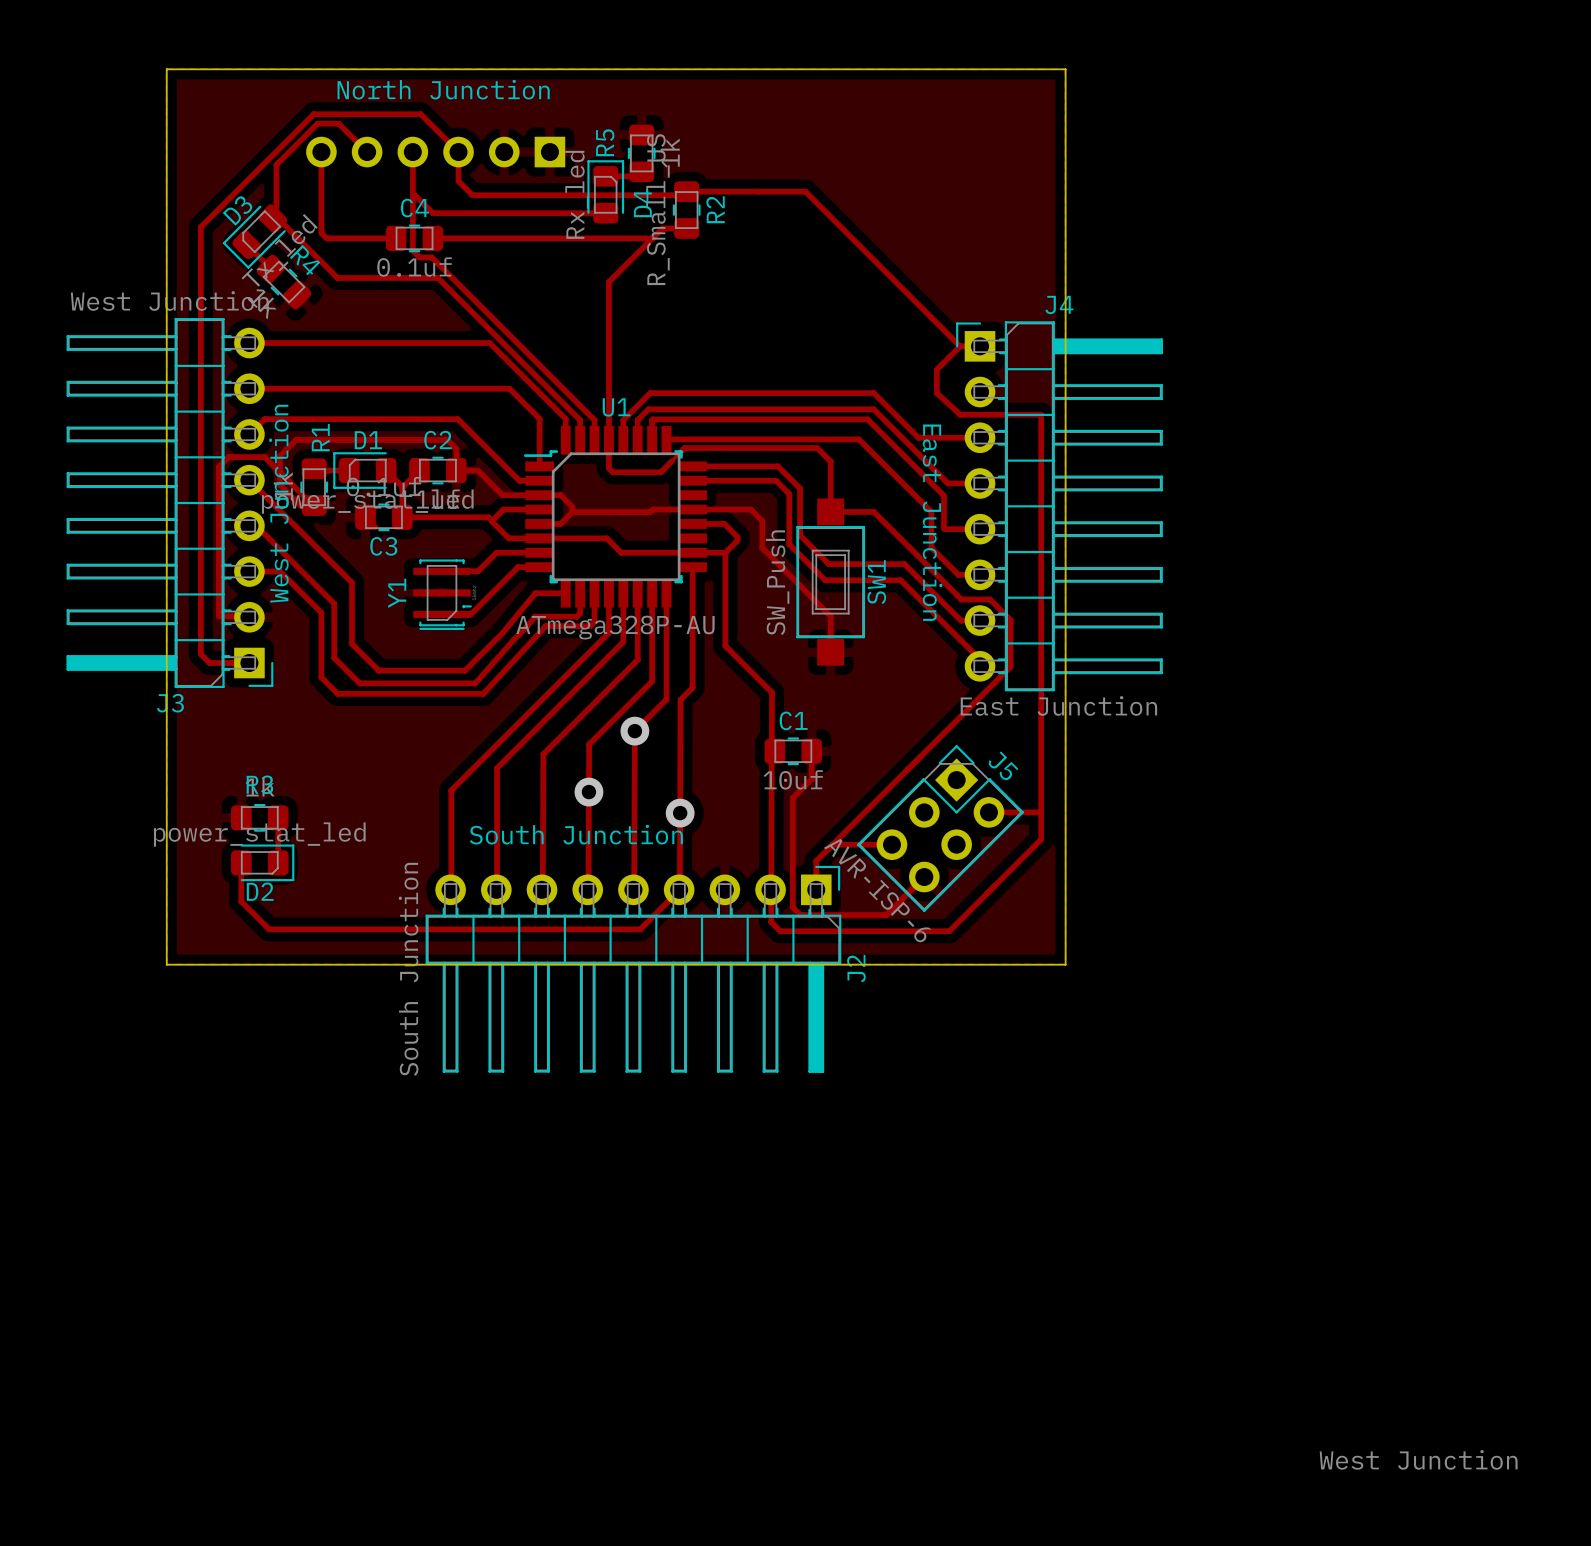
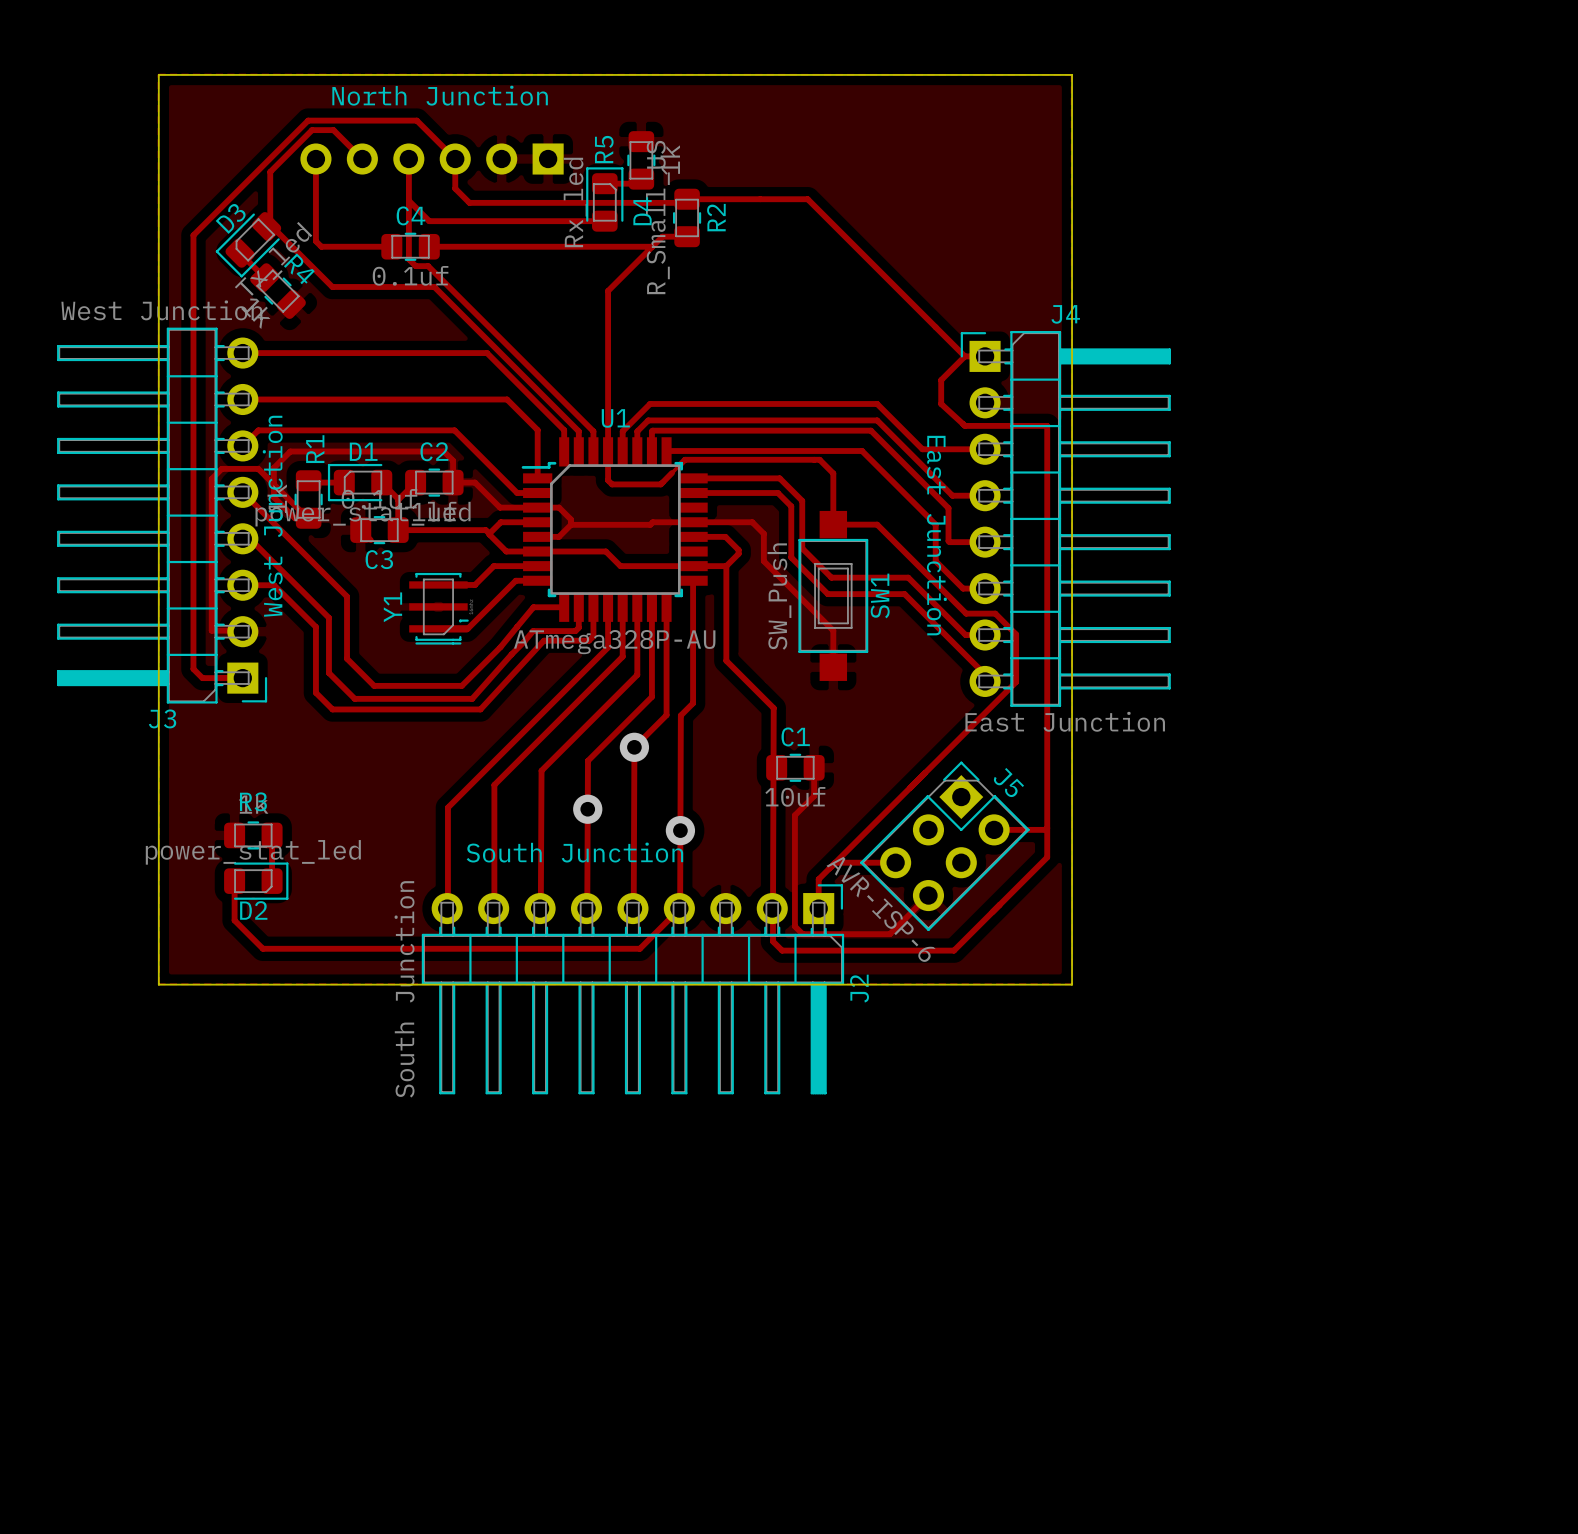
drawing: [1319, 1450, 1518, 1470] -> none

